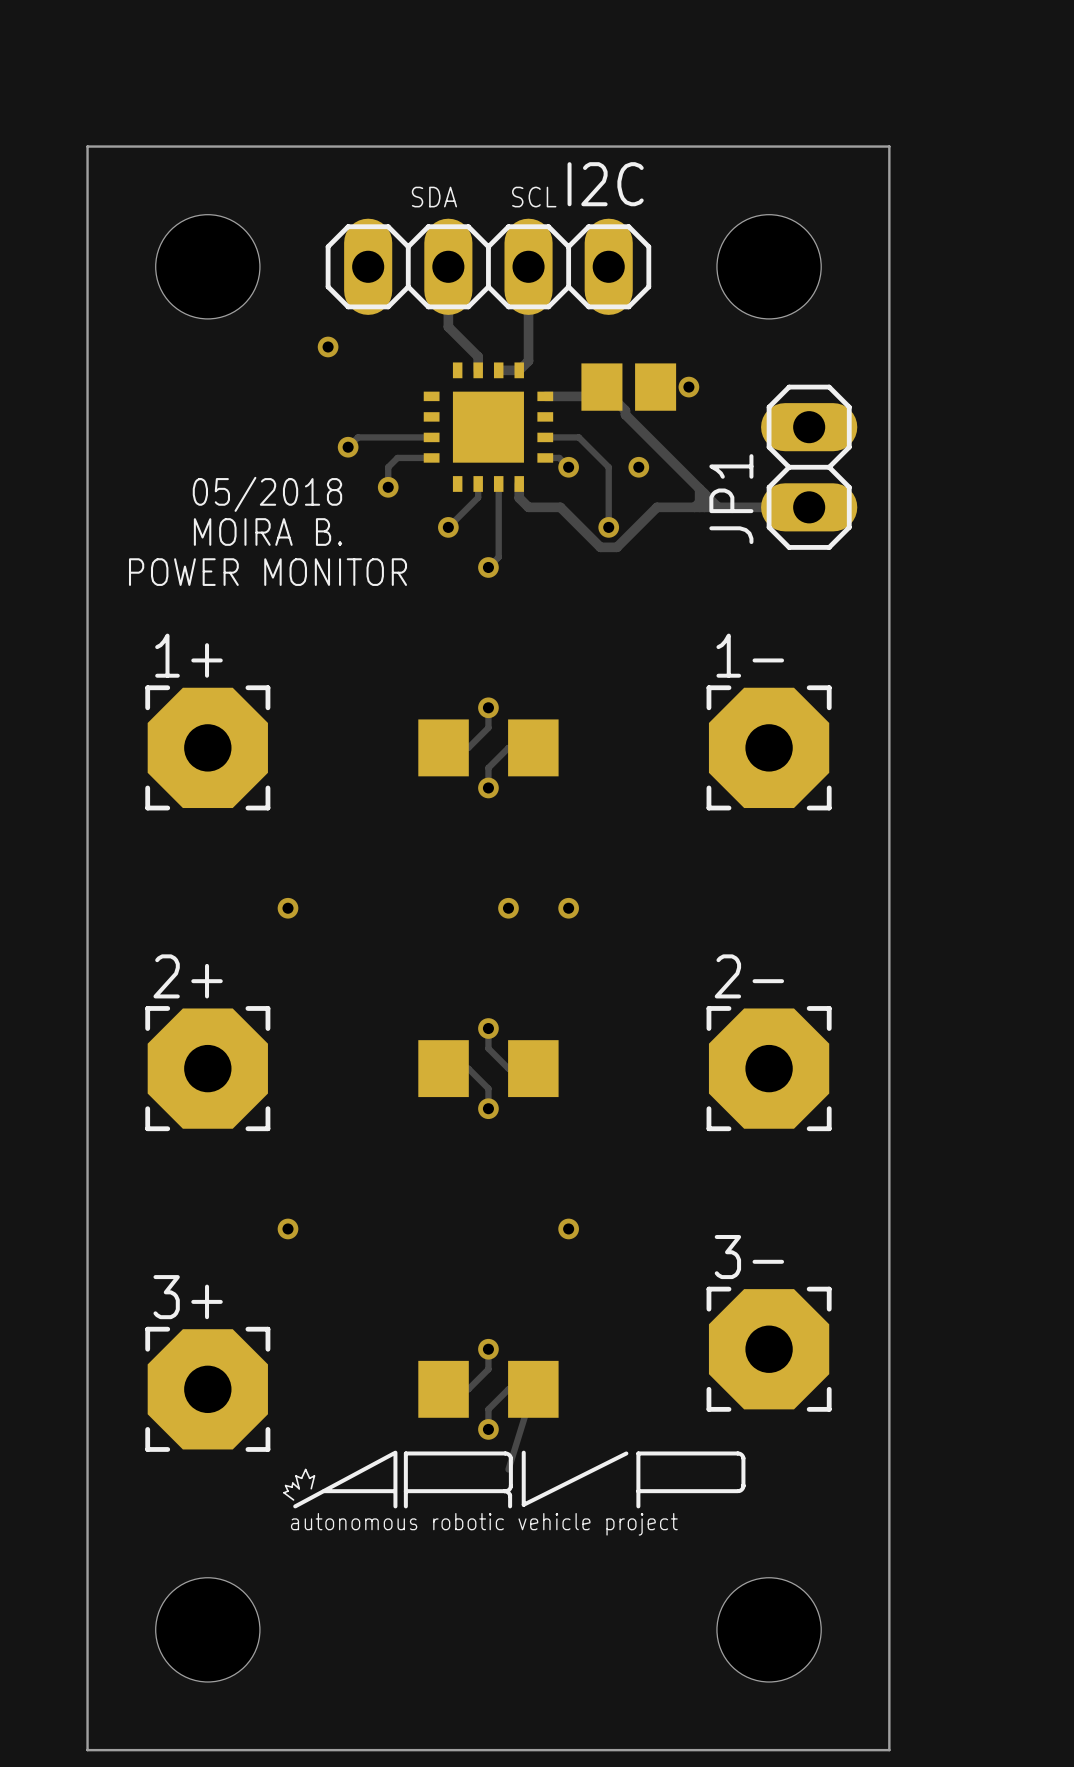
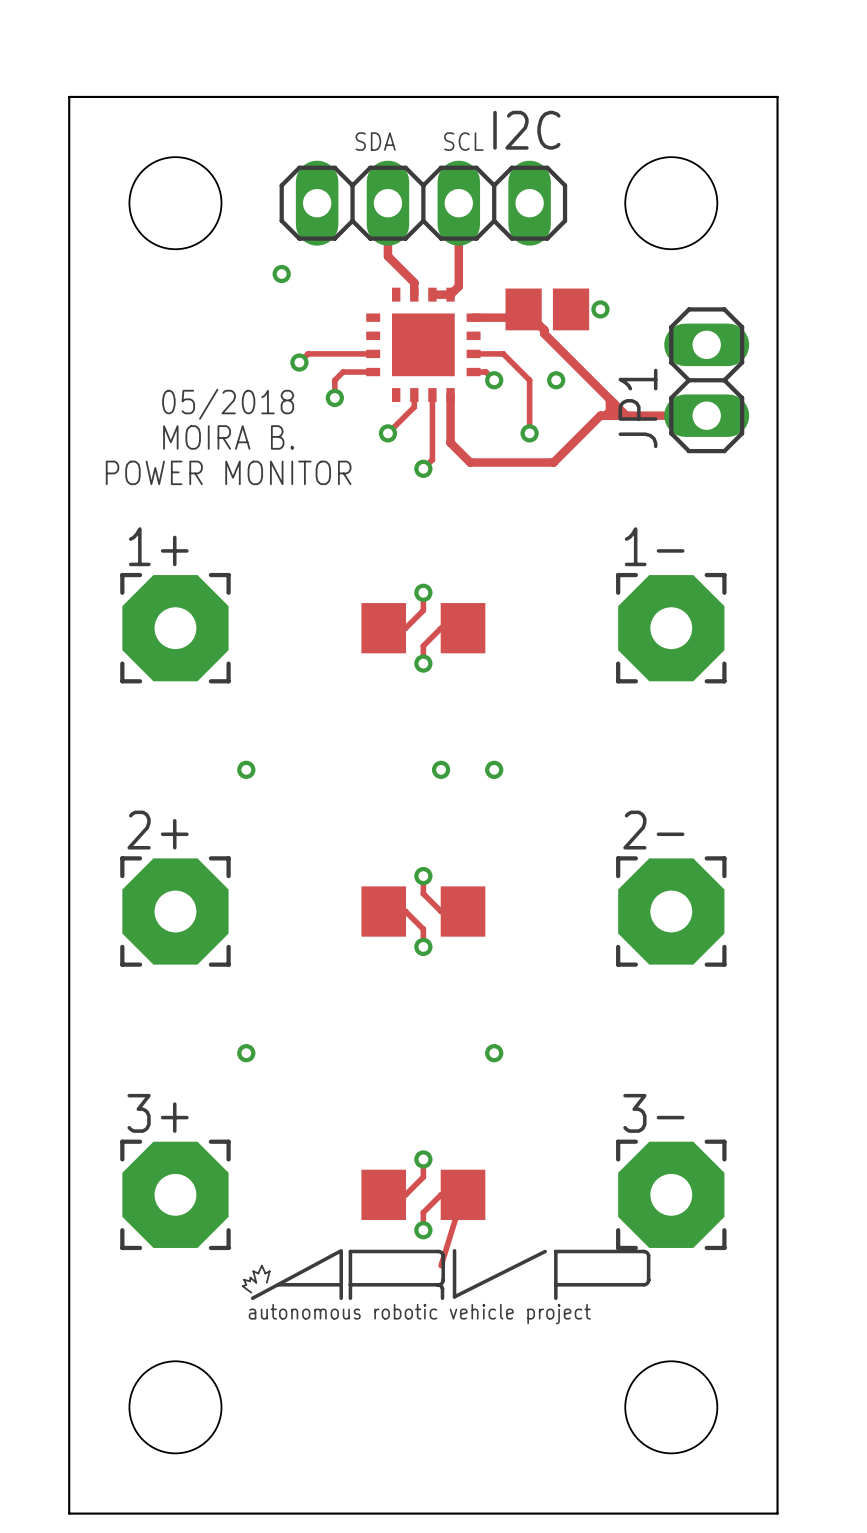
track: (519, 498) (528, 507) (560, 507) (600, 547) (616, 547) (656, 507) (688, 507) -> (450, 407) (450, 442) (470, 462) (553, 462) (600, 415)
3- position: (769, 1349) -> (671, 1194)

